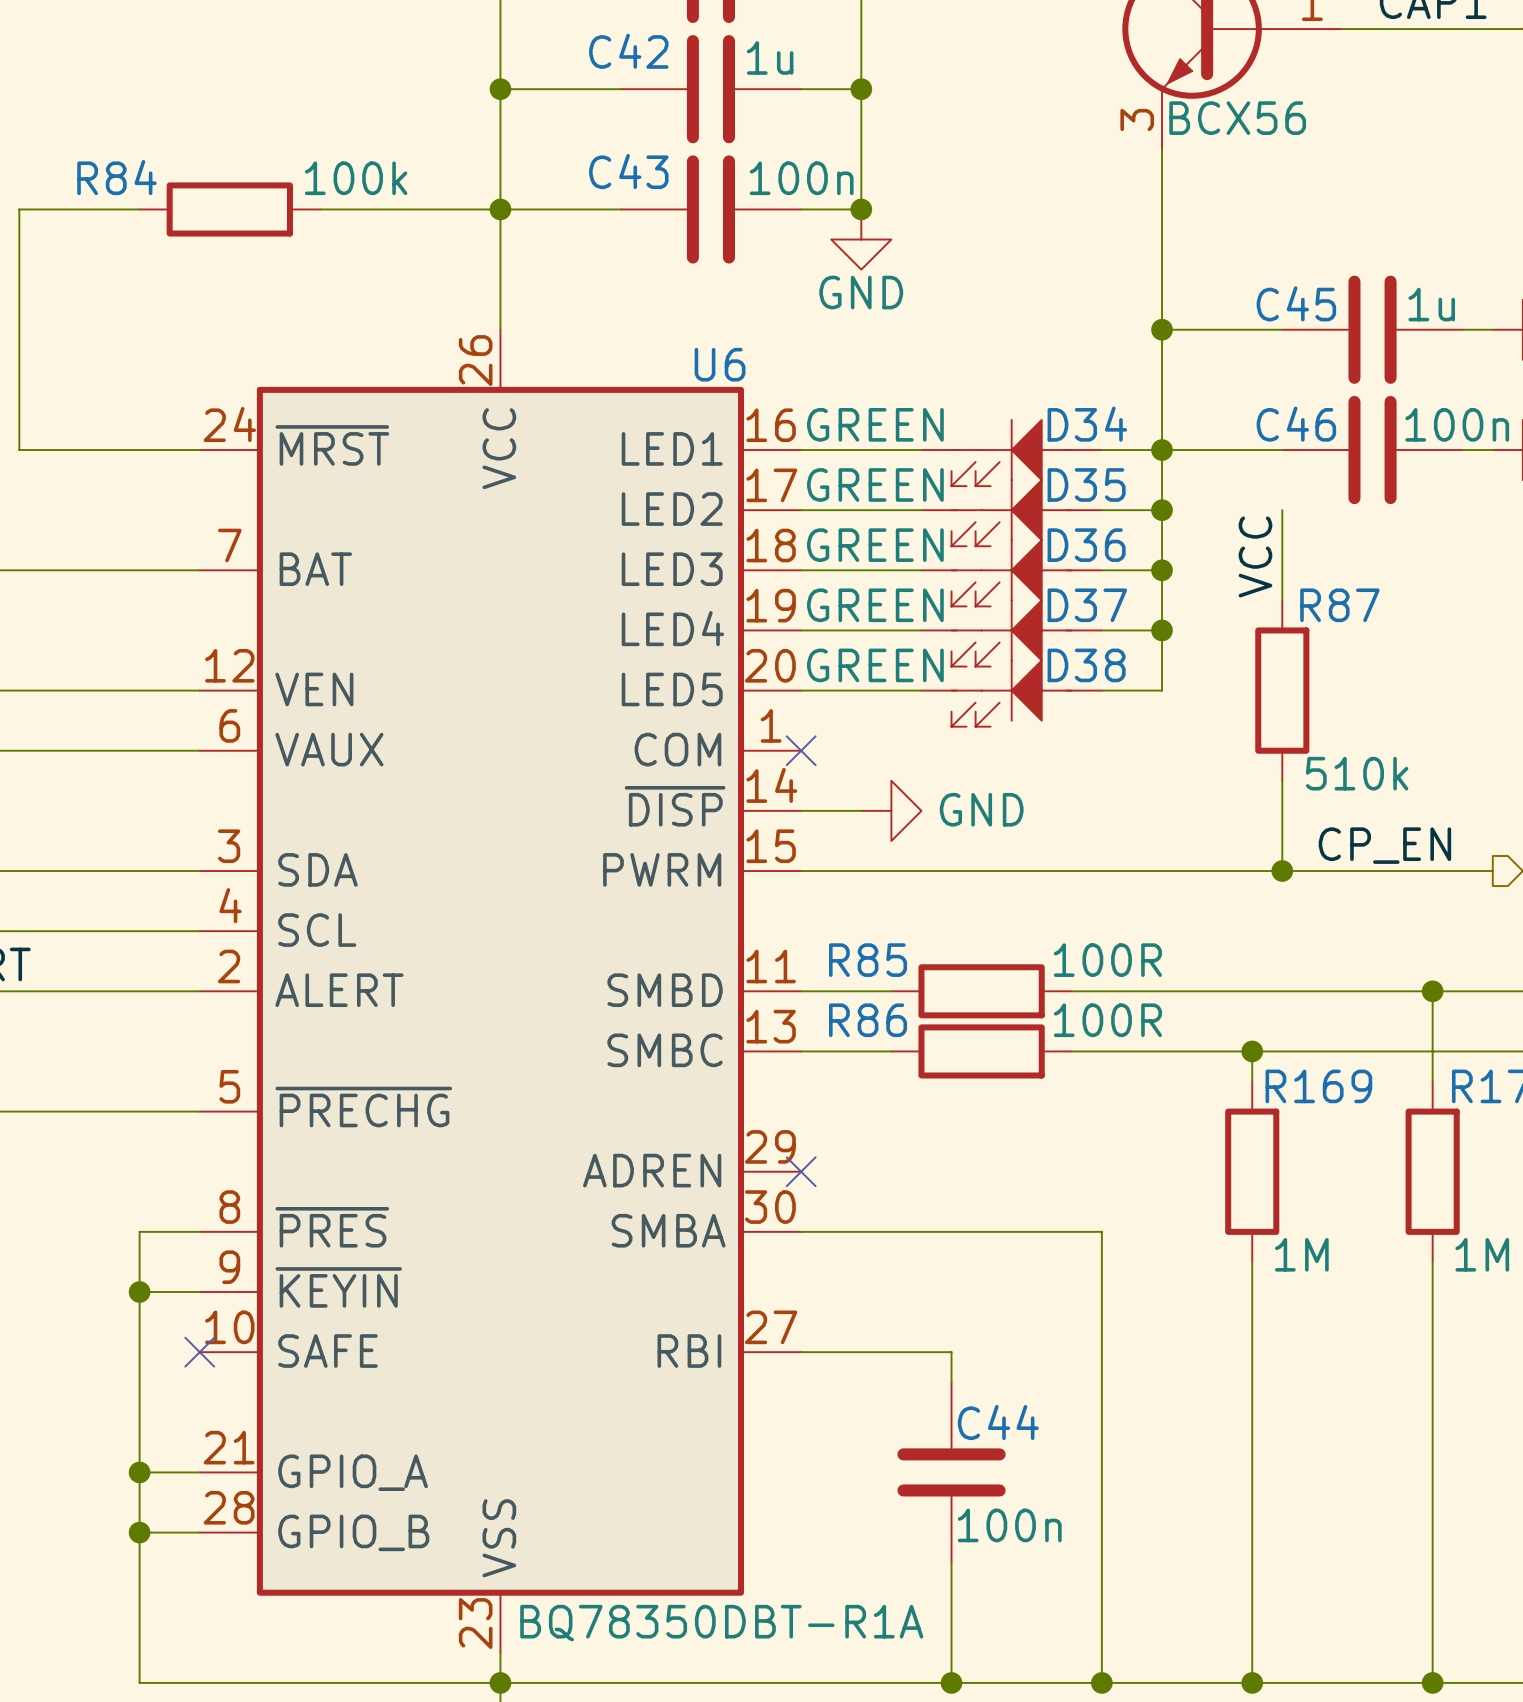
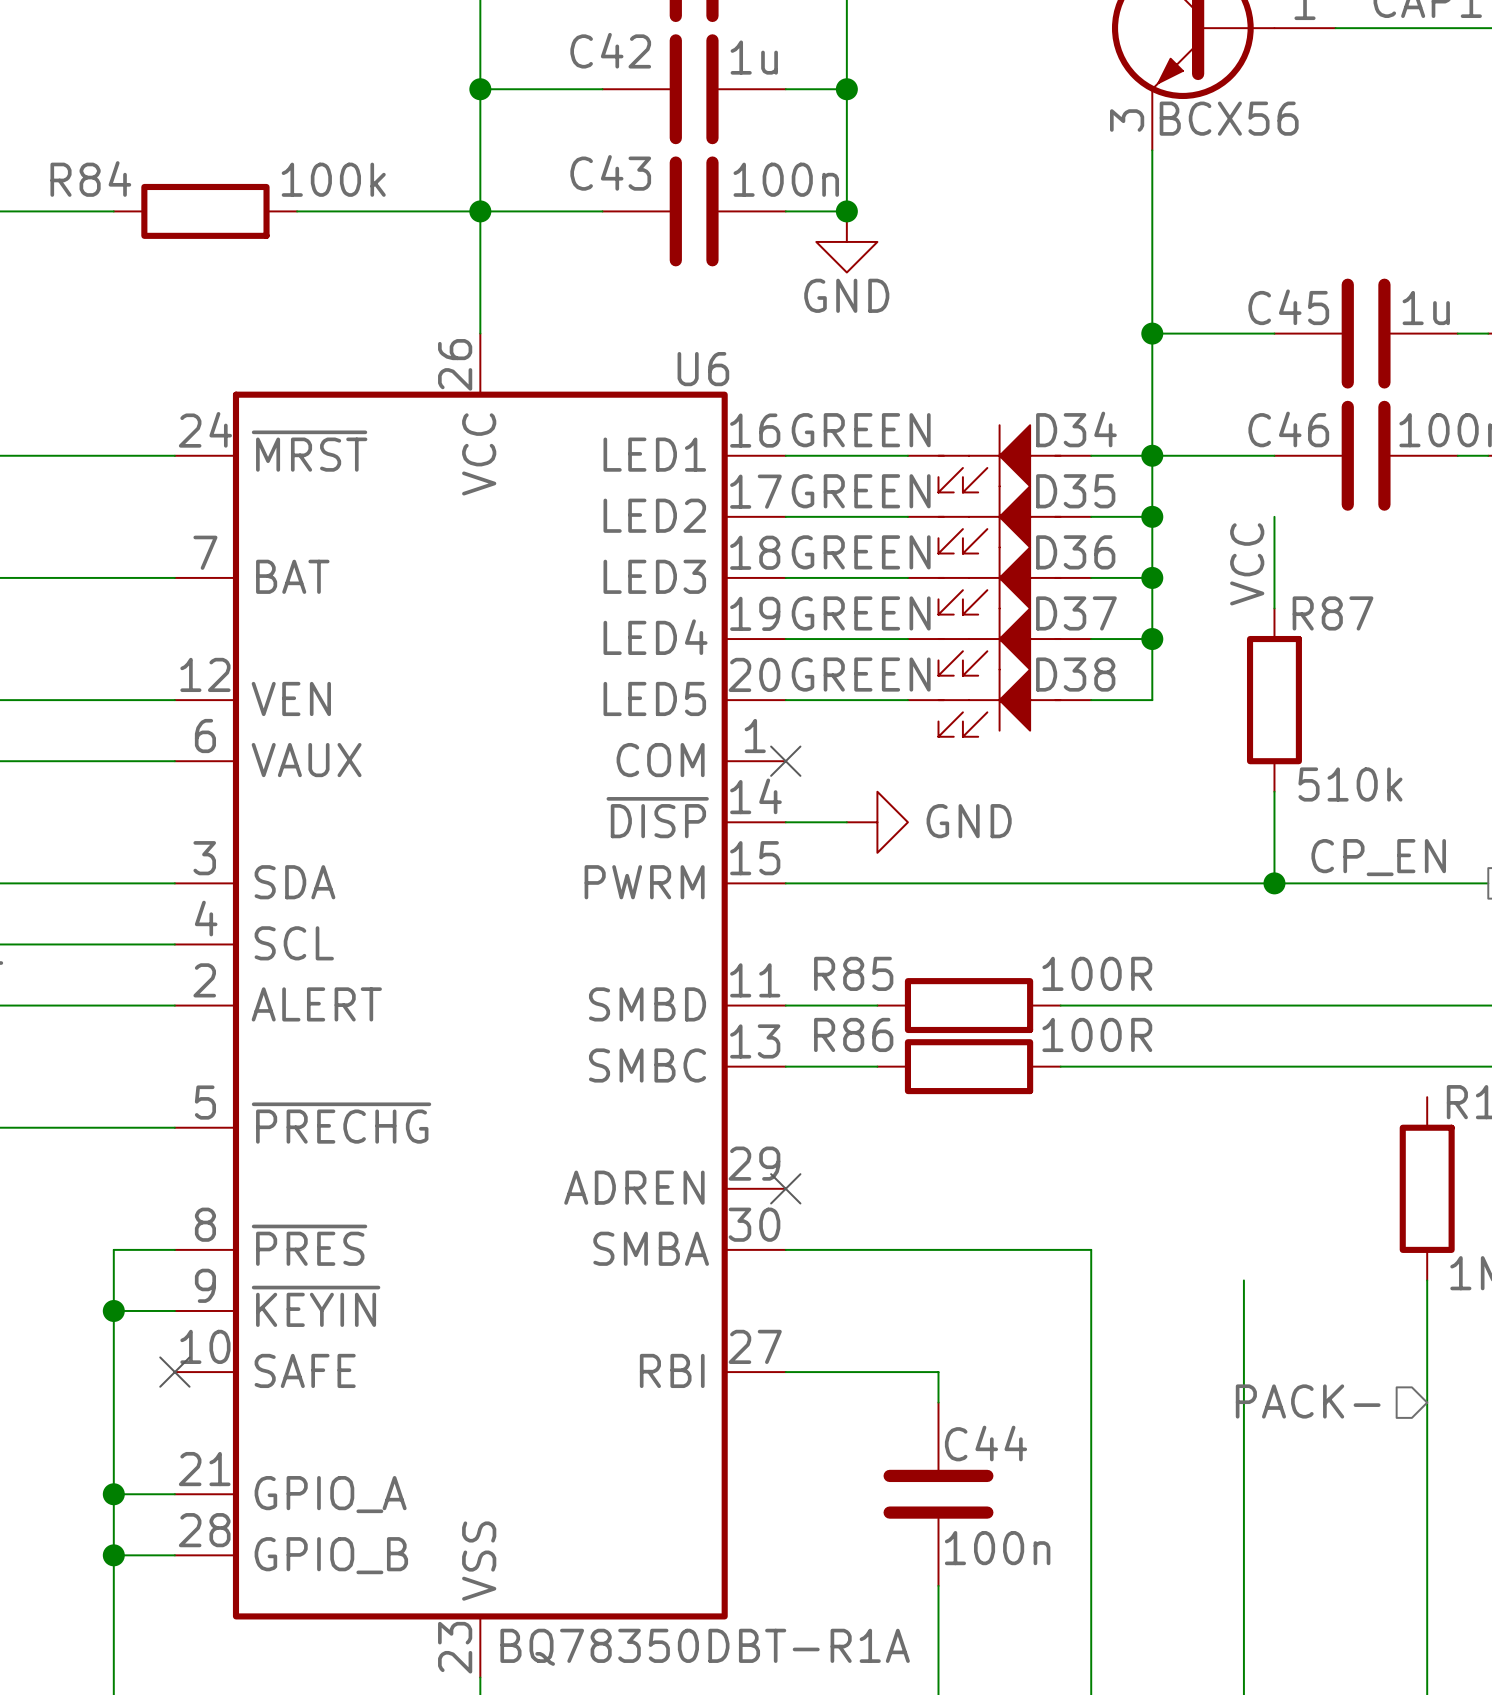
wire: (1432, 991) (1432, 1081) -> none
junction: (1432, 991) -> none
wire: (1252, 1051) (1252, 1081) -> none
junction: (1252, 1051) -> none
R169: 1M (1252, 1171) -> none
hierarchical label: none -> PACK- (1308, 1401)

